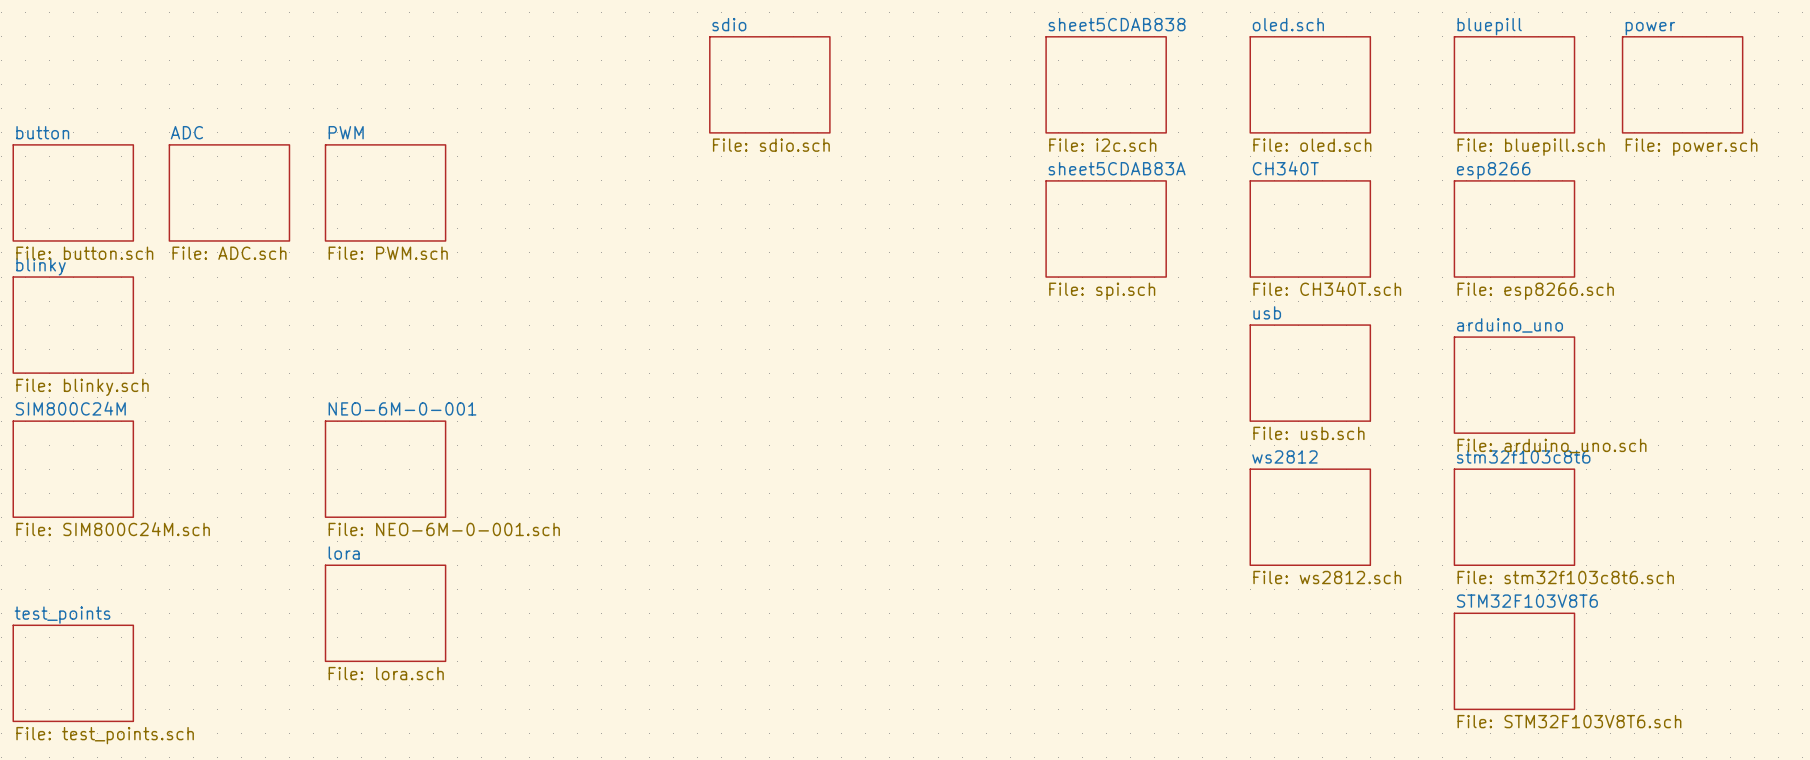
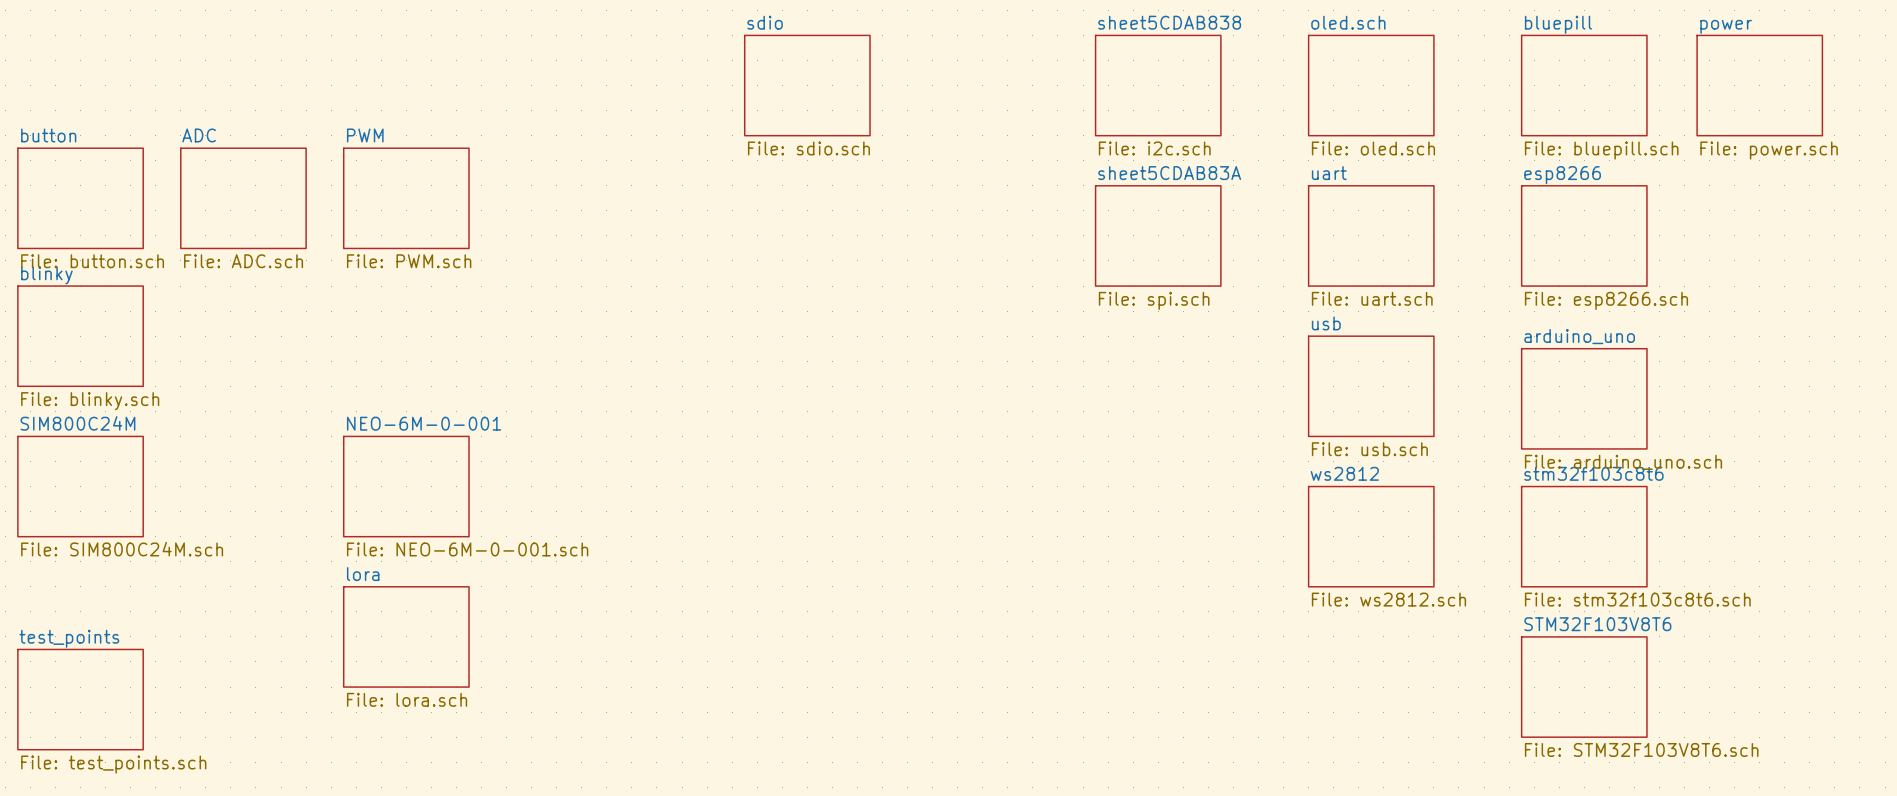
sheet CH340T name: CH340T (1285, 168) -> uart (1329, 173)
sheet CH340T value: File: CH340T.sch (1327, 288) -> File: uart.sch (1372, 298)

